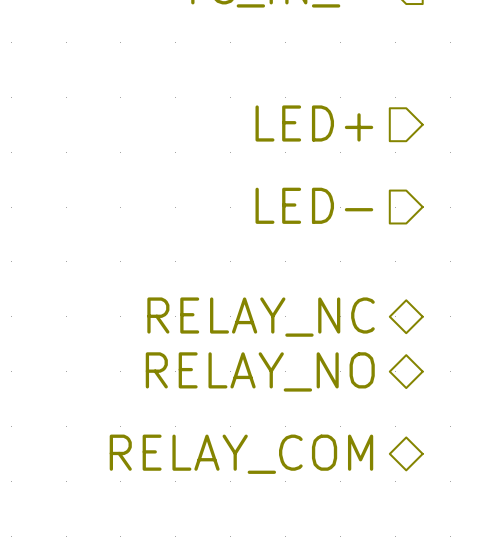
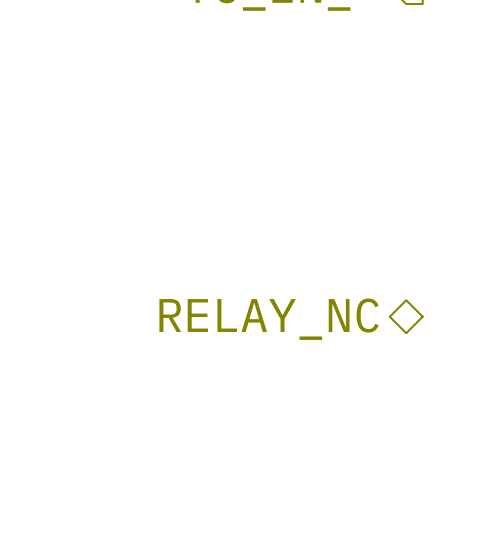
hierarchical label: LED+ (314, 123) -> none
hierarchical label: LED- (314, 205) -> none
hierarchical label: RELAY_NO (260, 371) -> none
hierarchical label: RELAY_COM (241, 454) -> none

